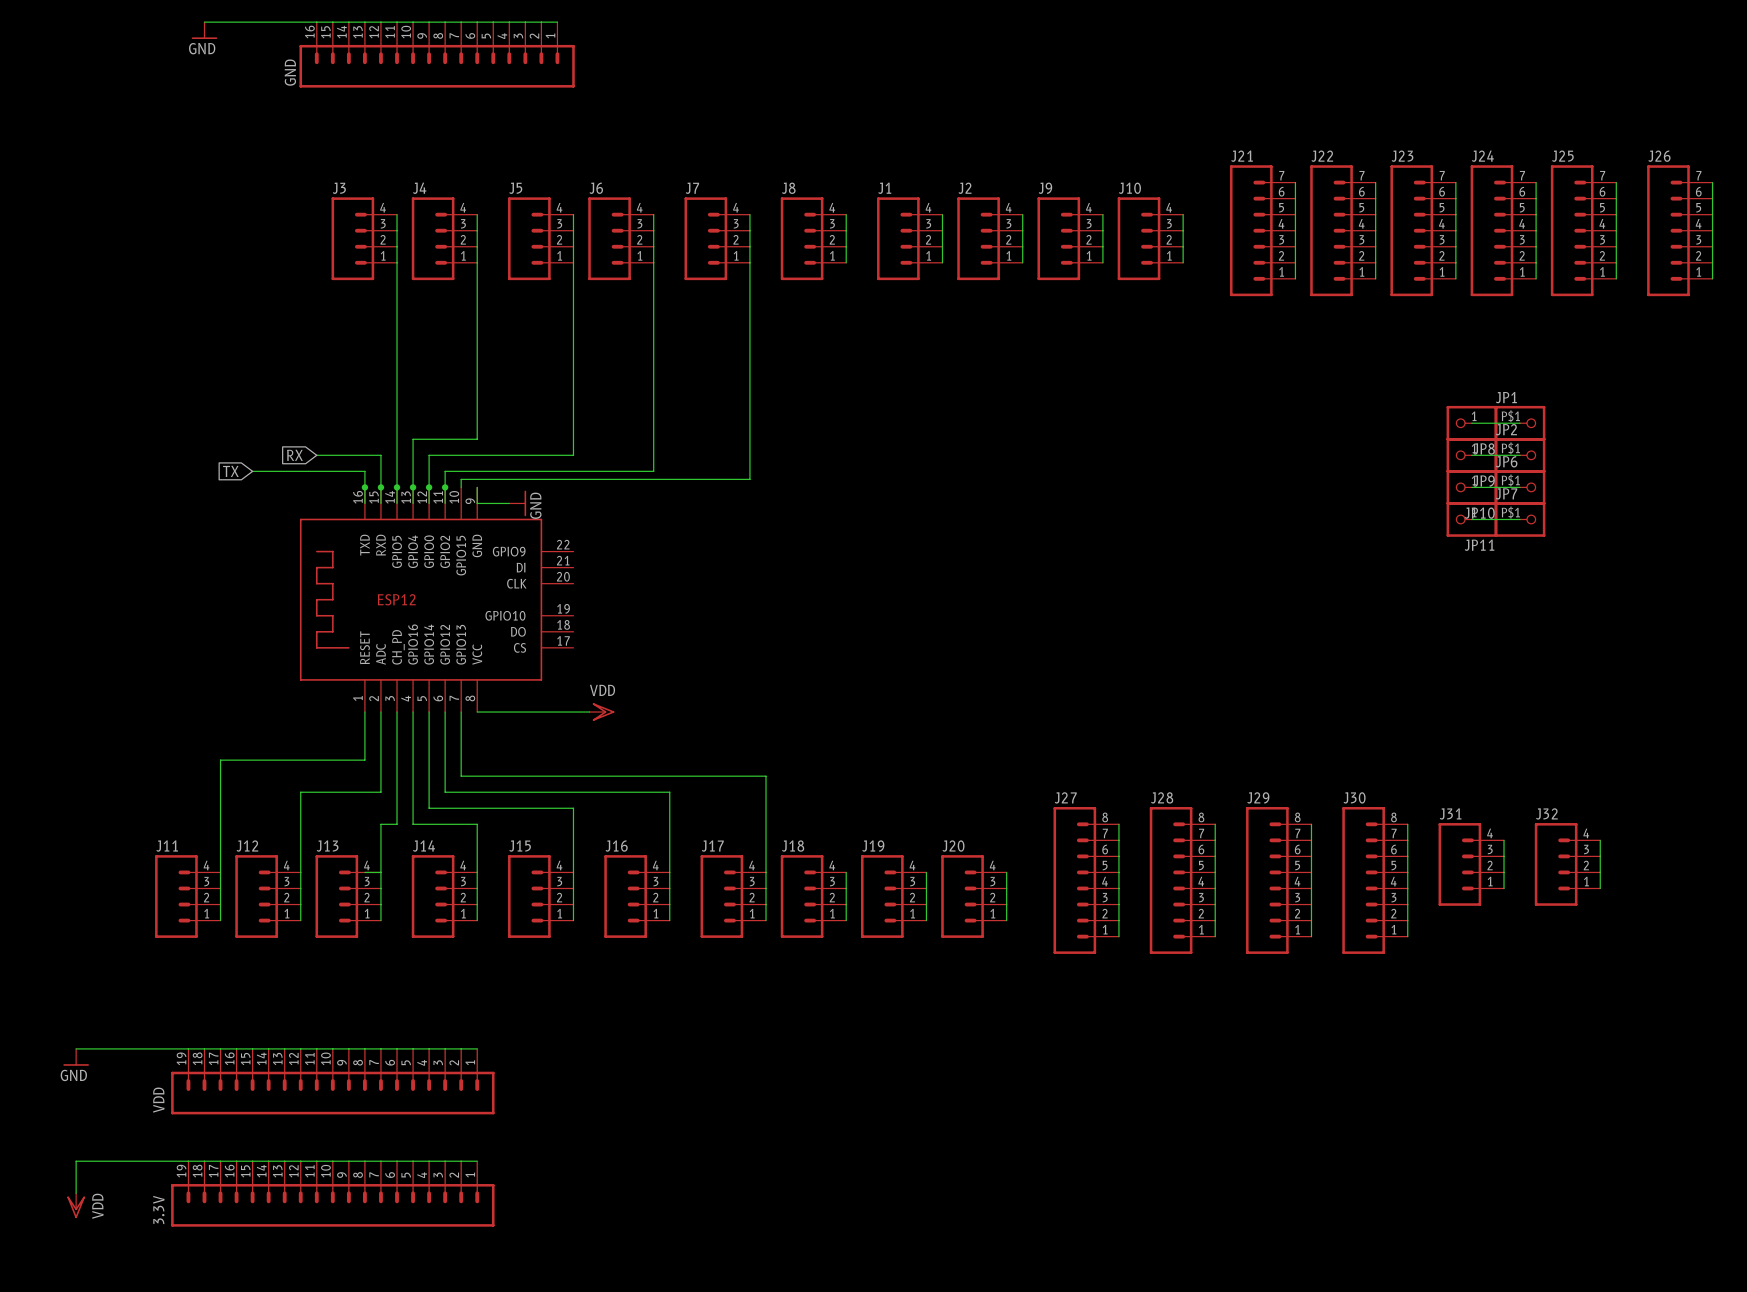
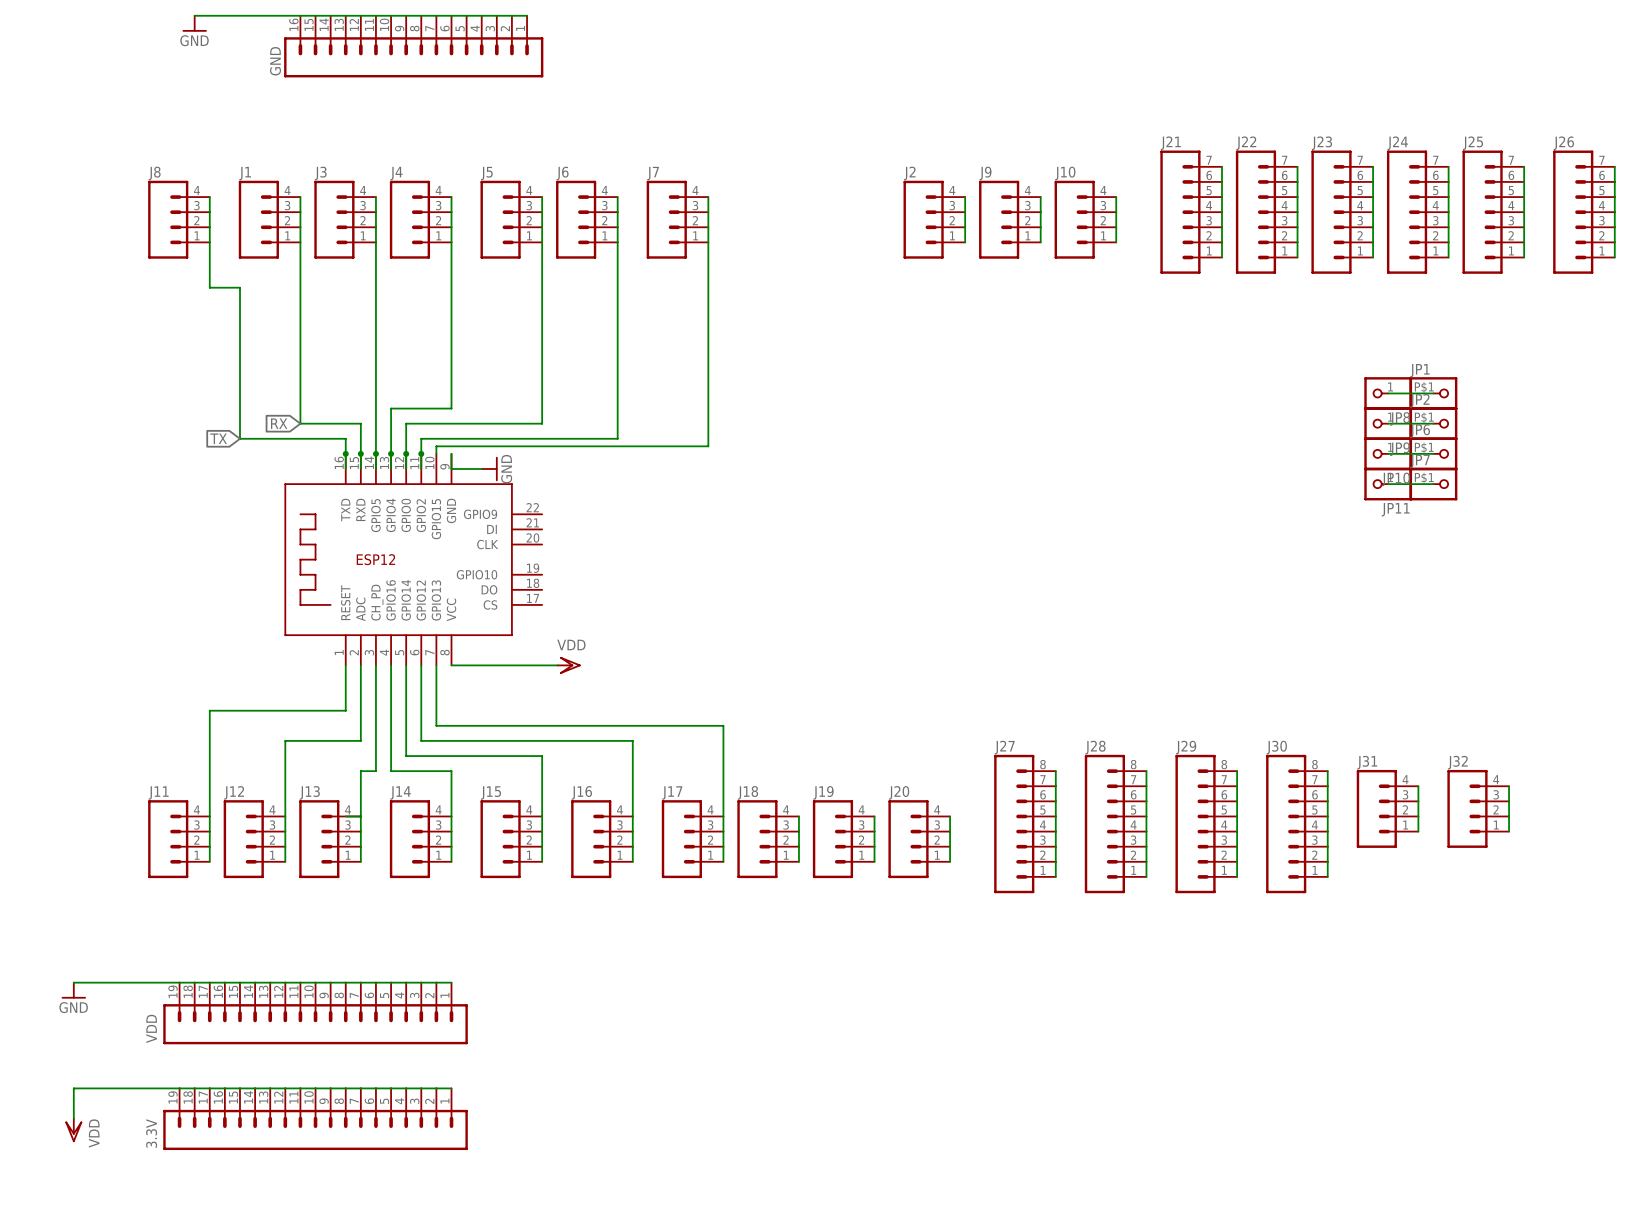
wire: none -> (209, 197) (209, 287) (239, 287) (239, 438)
wire: none -> (300, 197) (300, 423)
wire: (846, 214) (846, 262) -> none
wire: (942, 214) (942, 262) -> none
J8 position: (813, 238) -> (178, 219)
J1 position: (909, 238) -> (269, 219)

